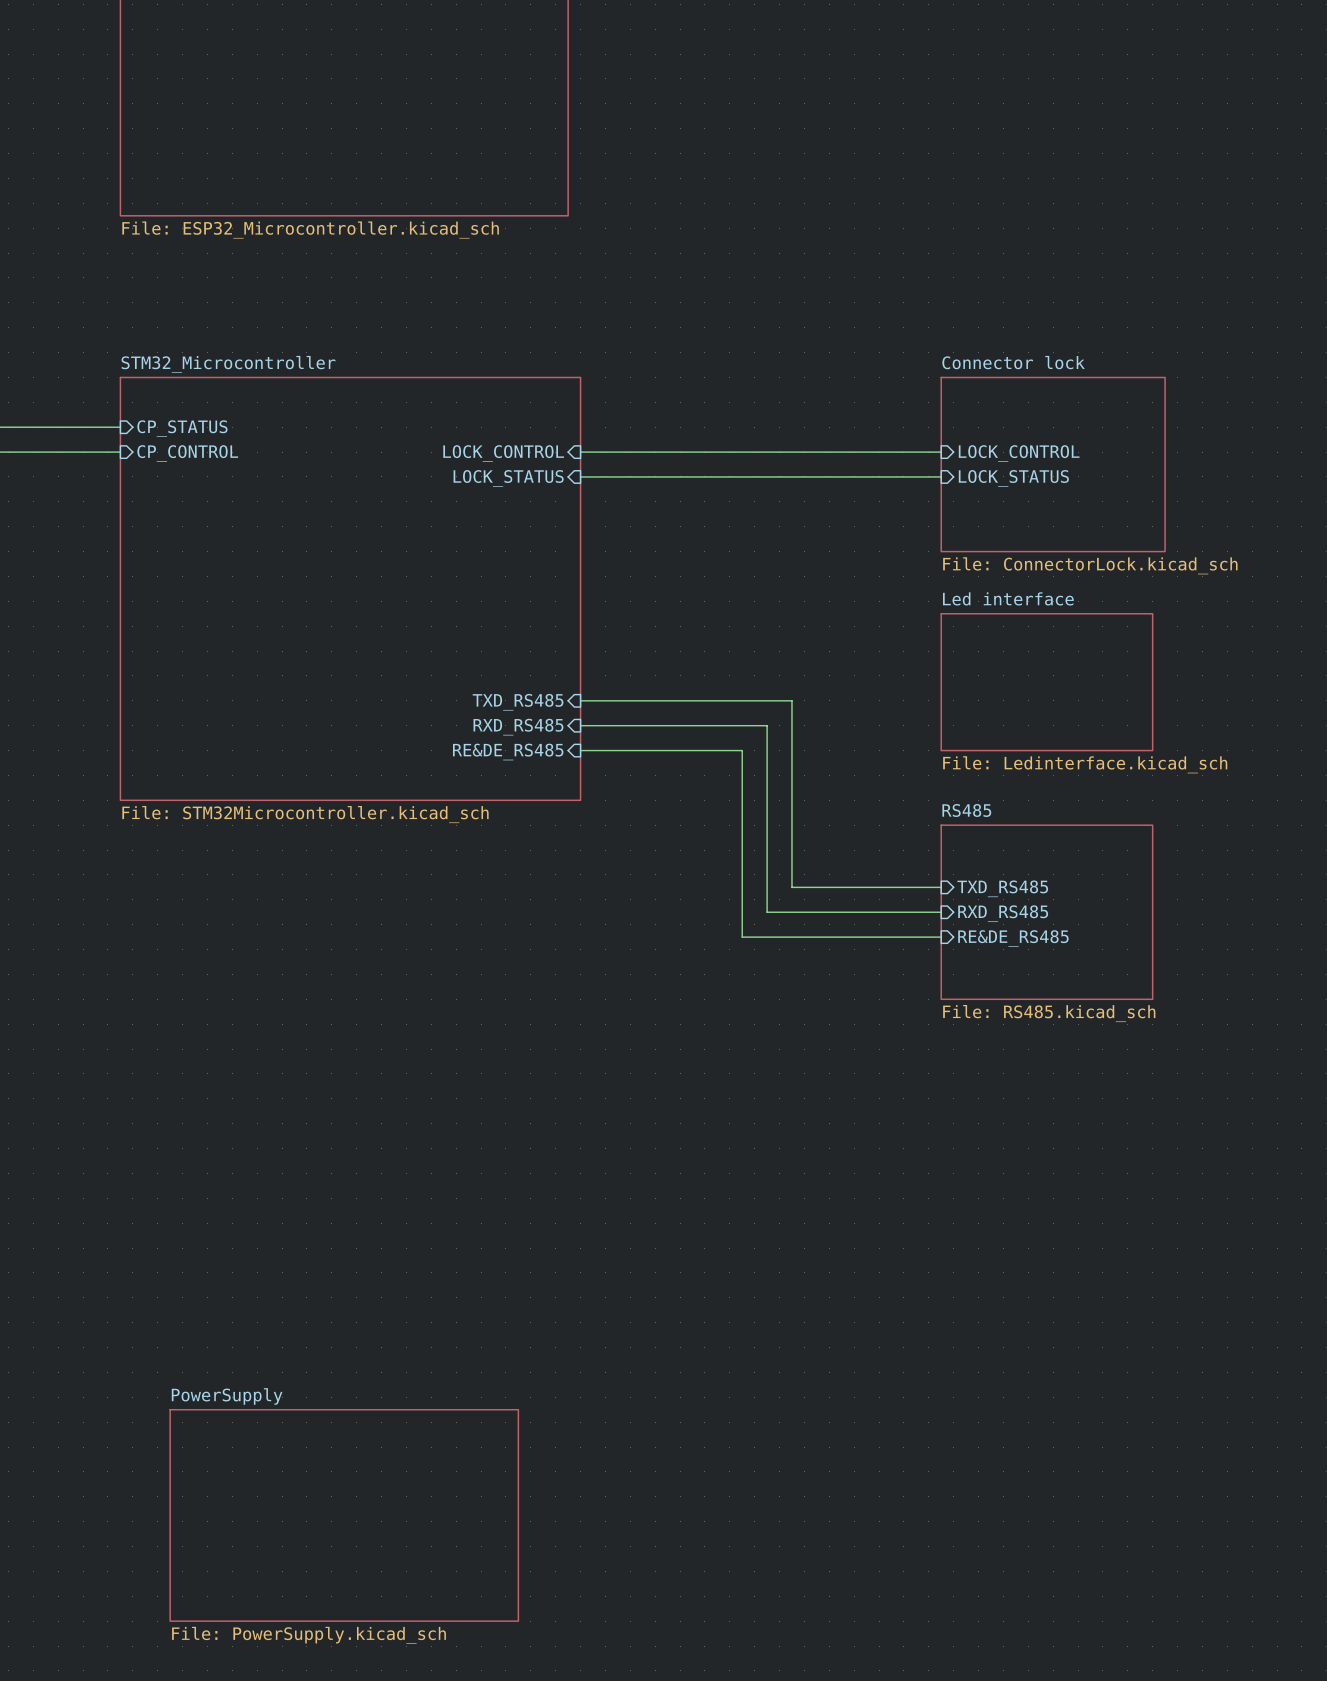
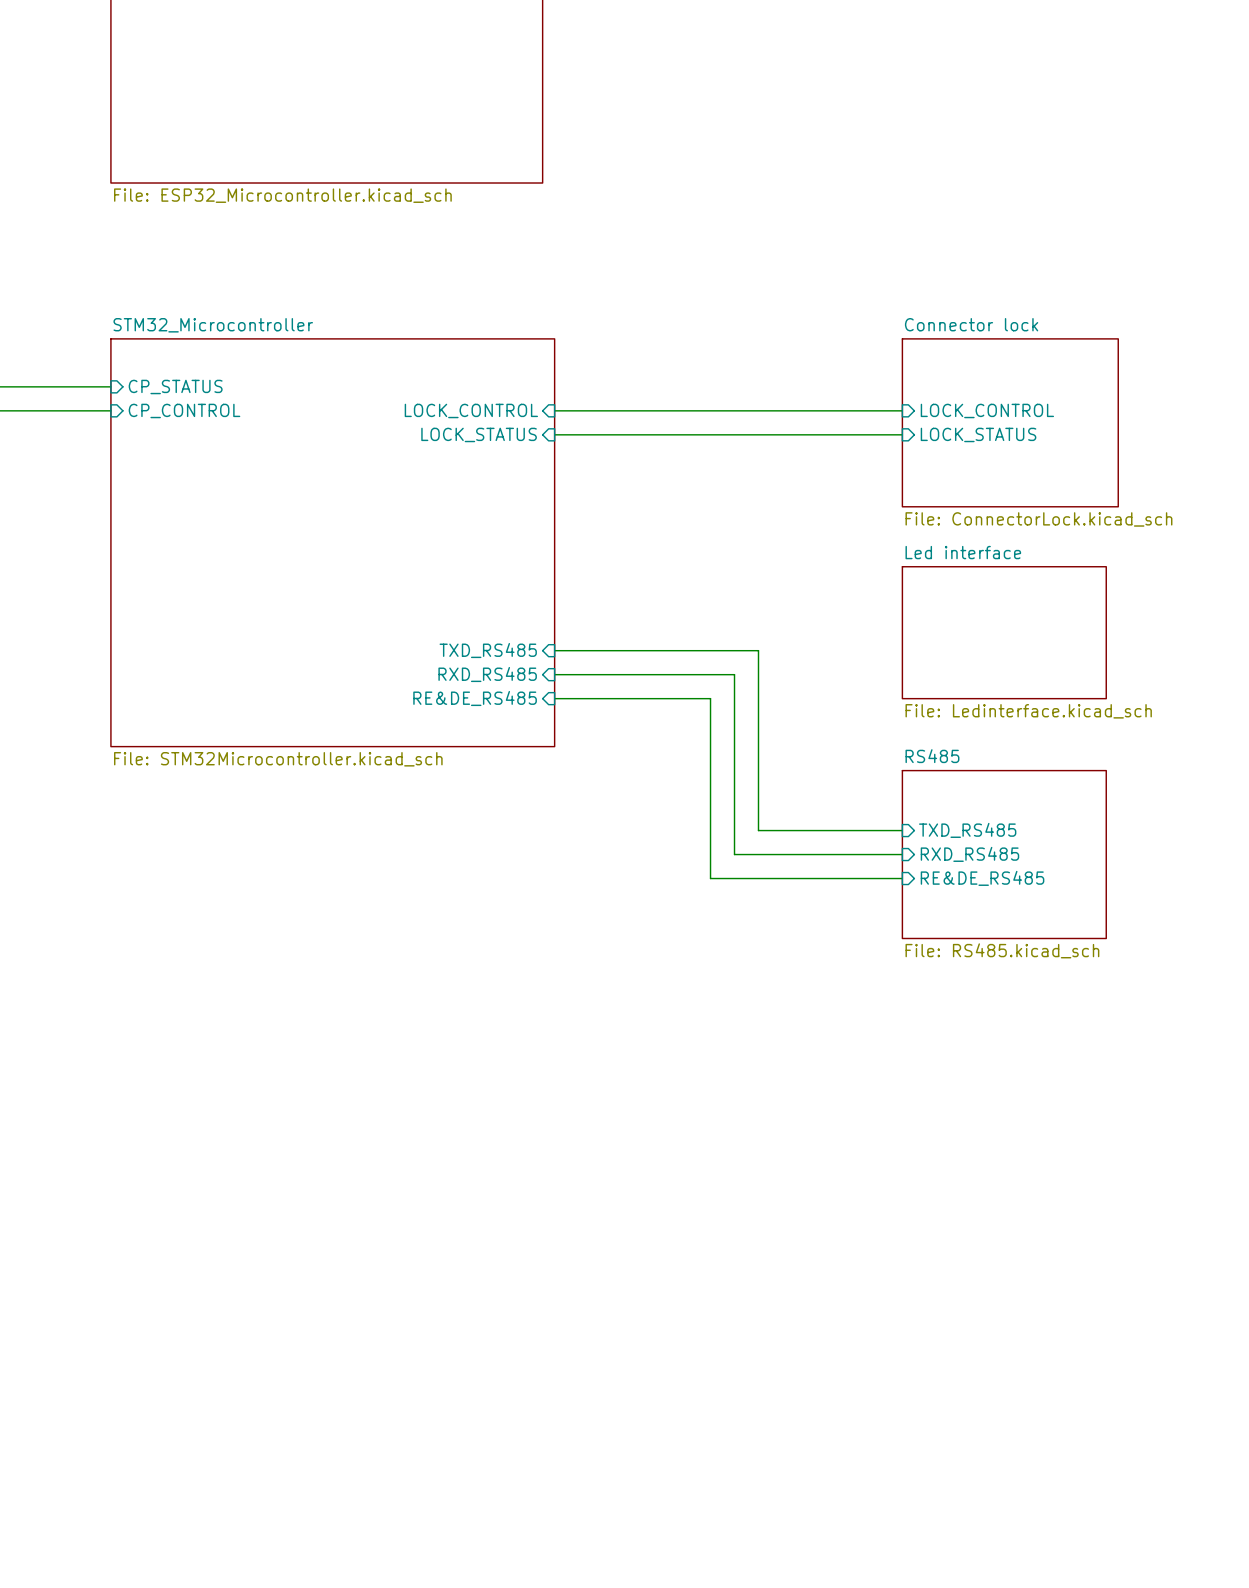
sheet PowerSupply: File: PowerSupply.kicad_sch (344, 1515) -> none

